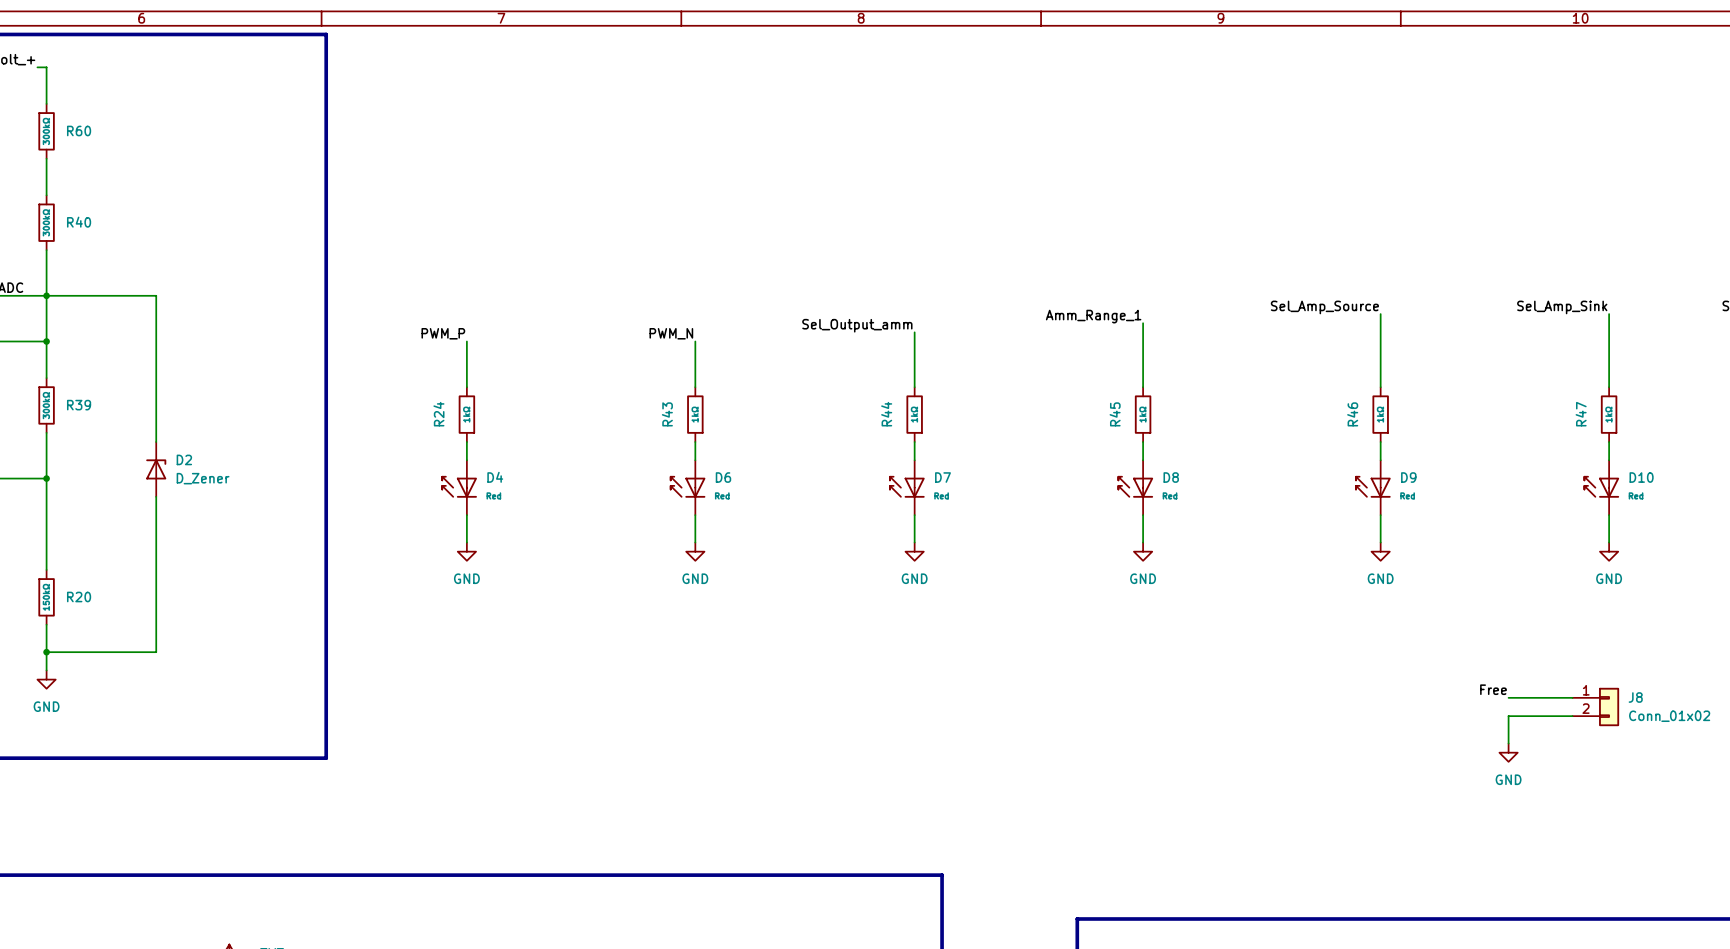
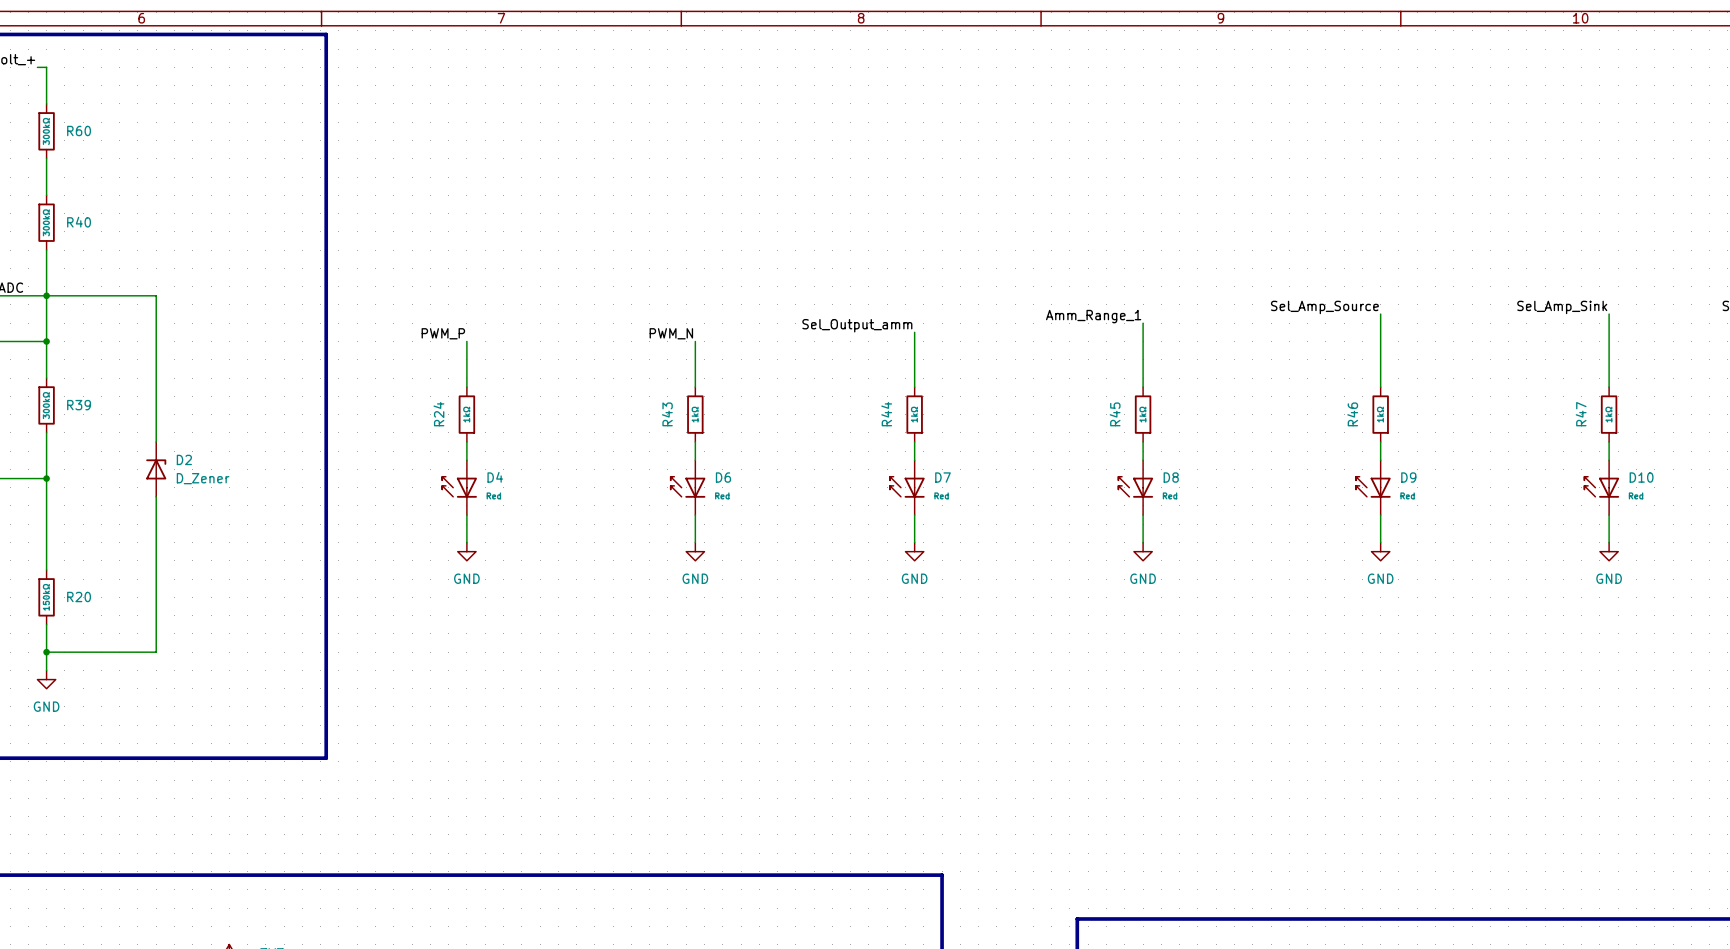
label: Free (1493, 689) -> none
wire: (1508, 697) (1572, 697) -> none
J8: Conn_01x02 (1595, 706) -> none
wire: (1572, 716) (1508, 716) (1508, 743) -> none
power symbol: GND (1508, 752) -> none

